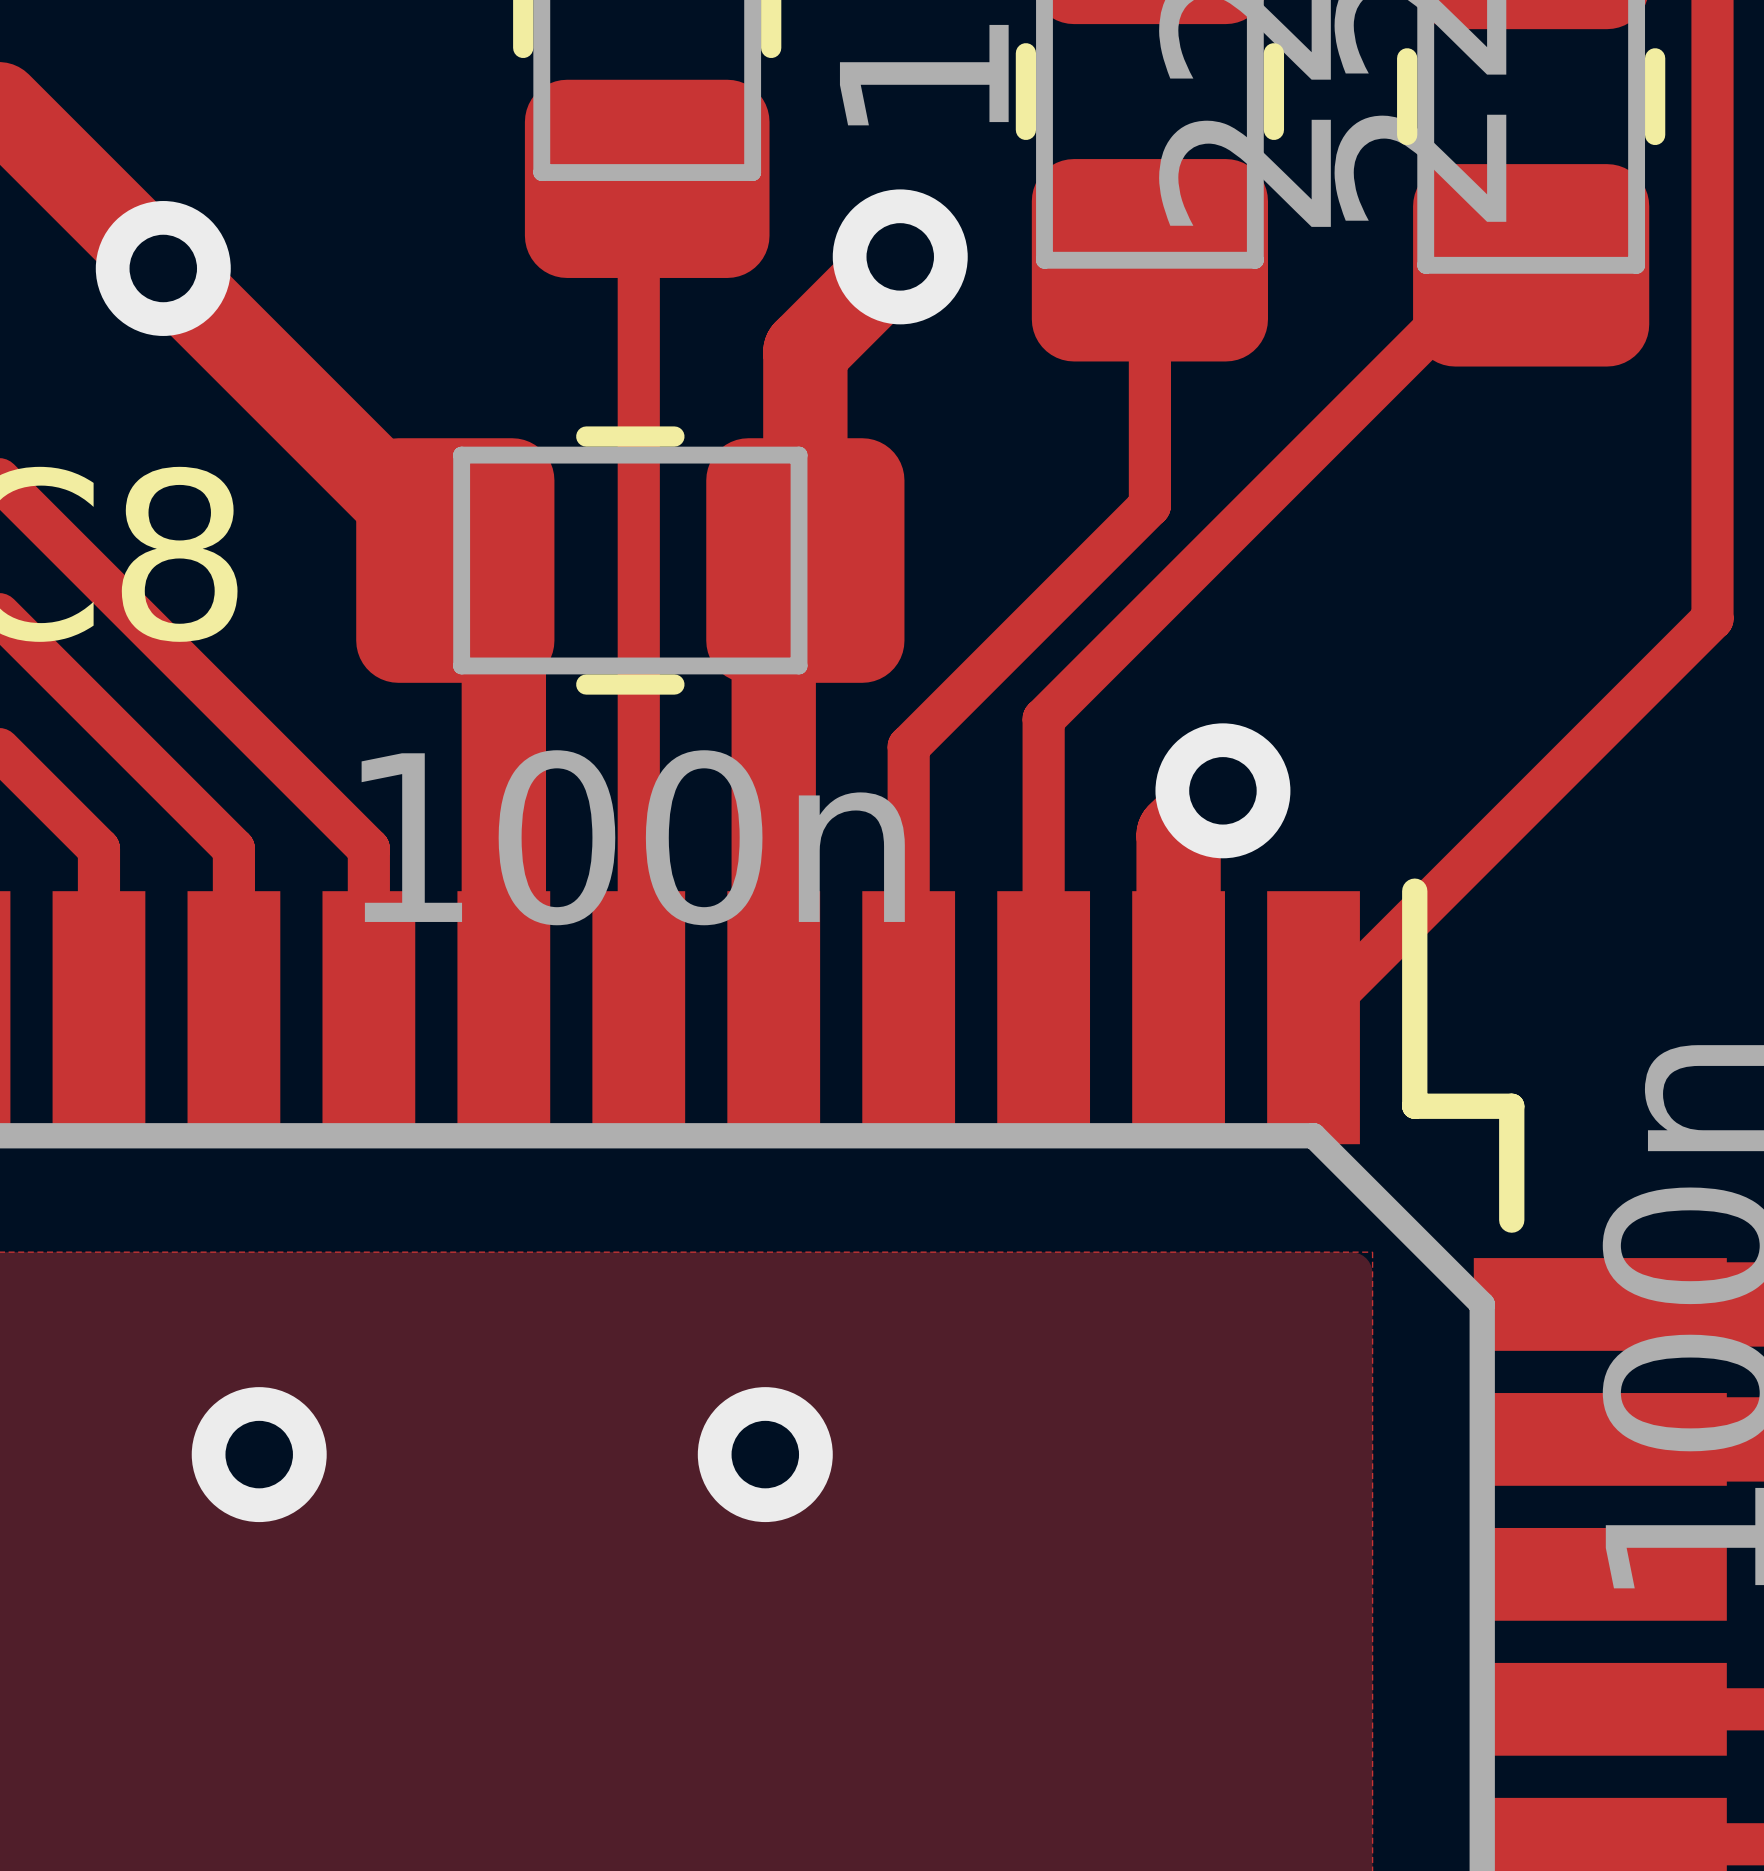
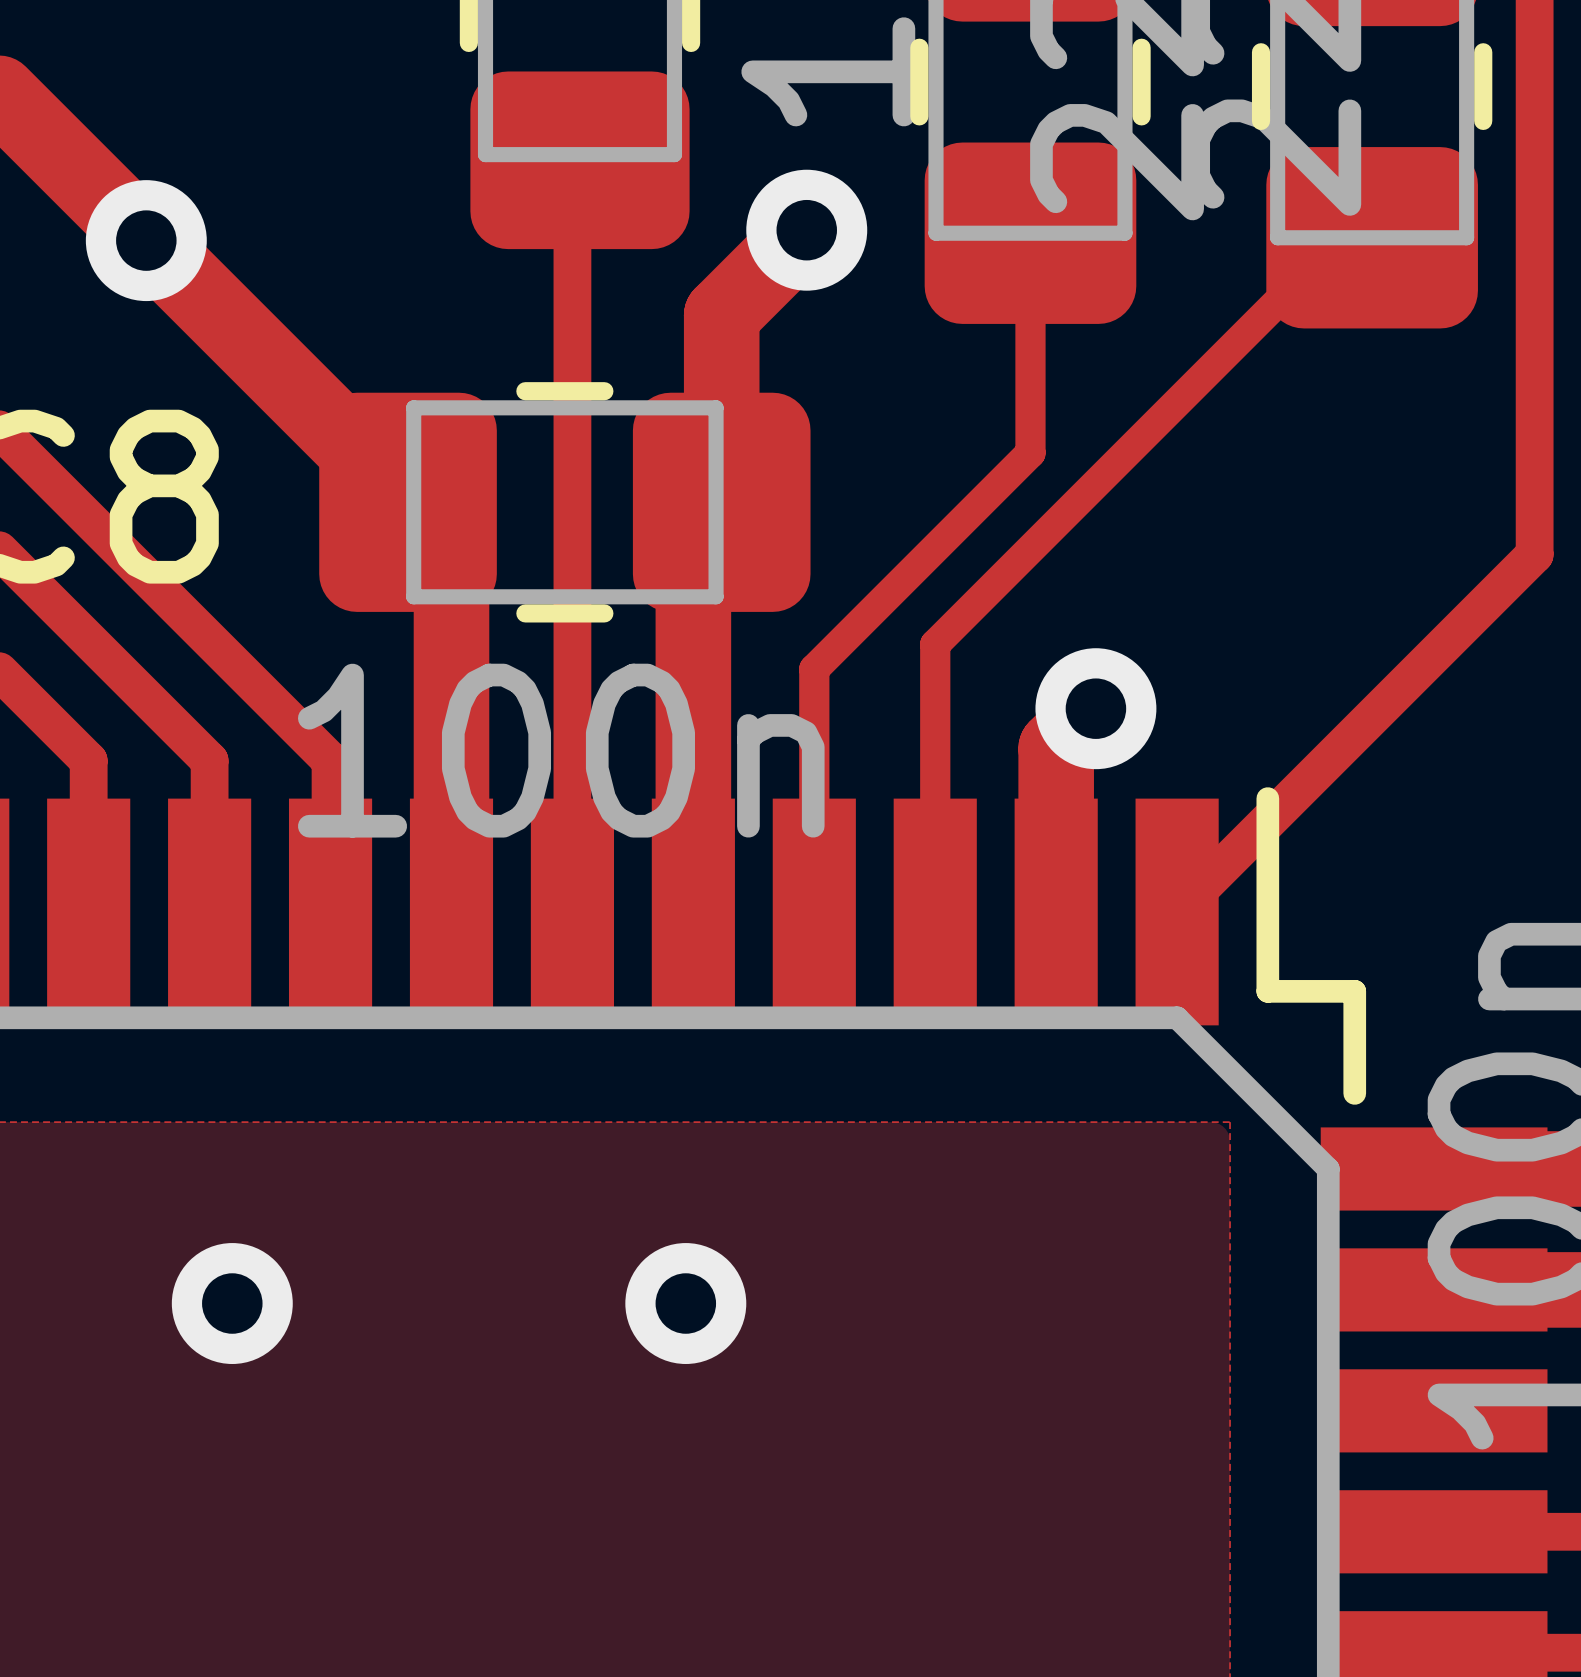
track width: thick (1149, 260) (1149, 505) (908, 746) (908, 1017) -> thin (1030, 233) (1030, 452) (814, 669) (814, 911)
track width: thick (1531, 265) (1497, 265) (1043, 719) (1043, 1017) -> thin (1372, 237) (1341, 237) (935, 644) (935, 911)

